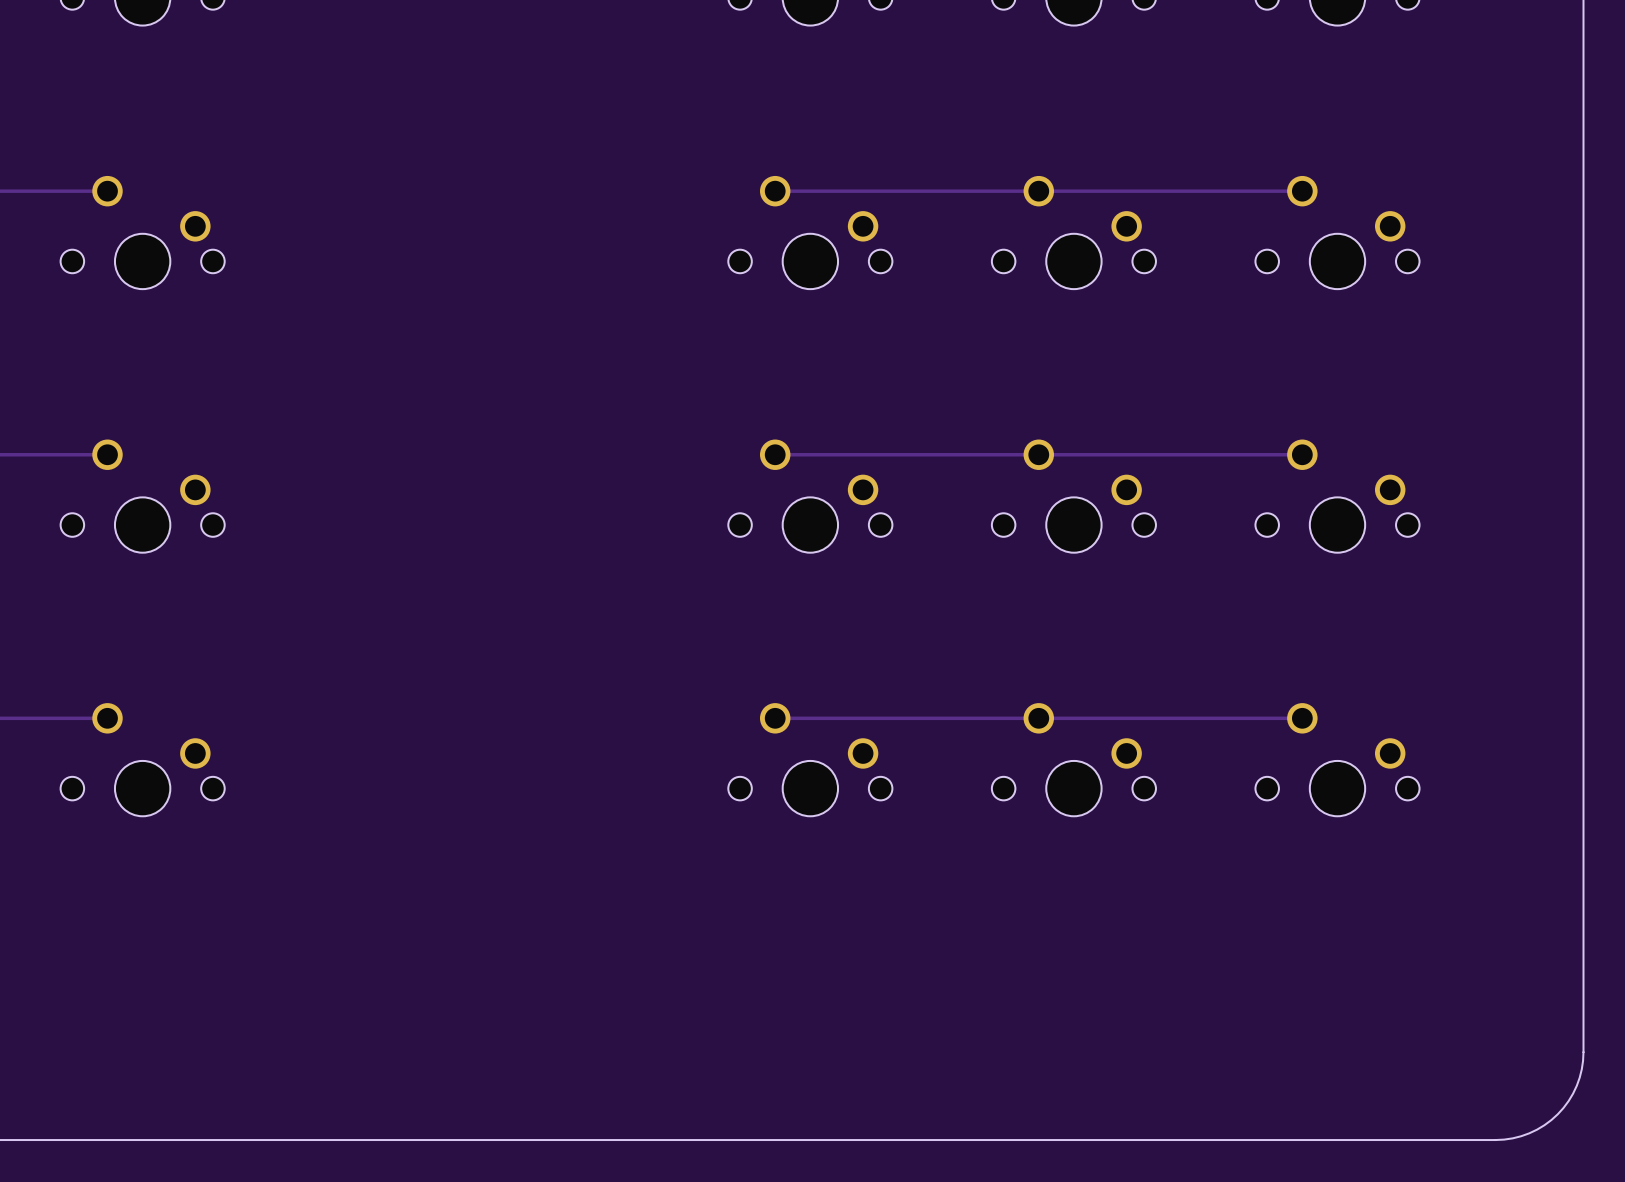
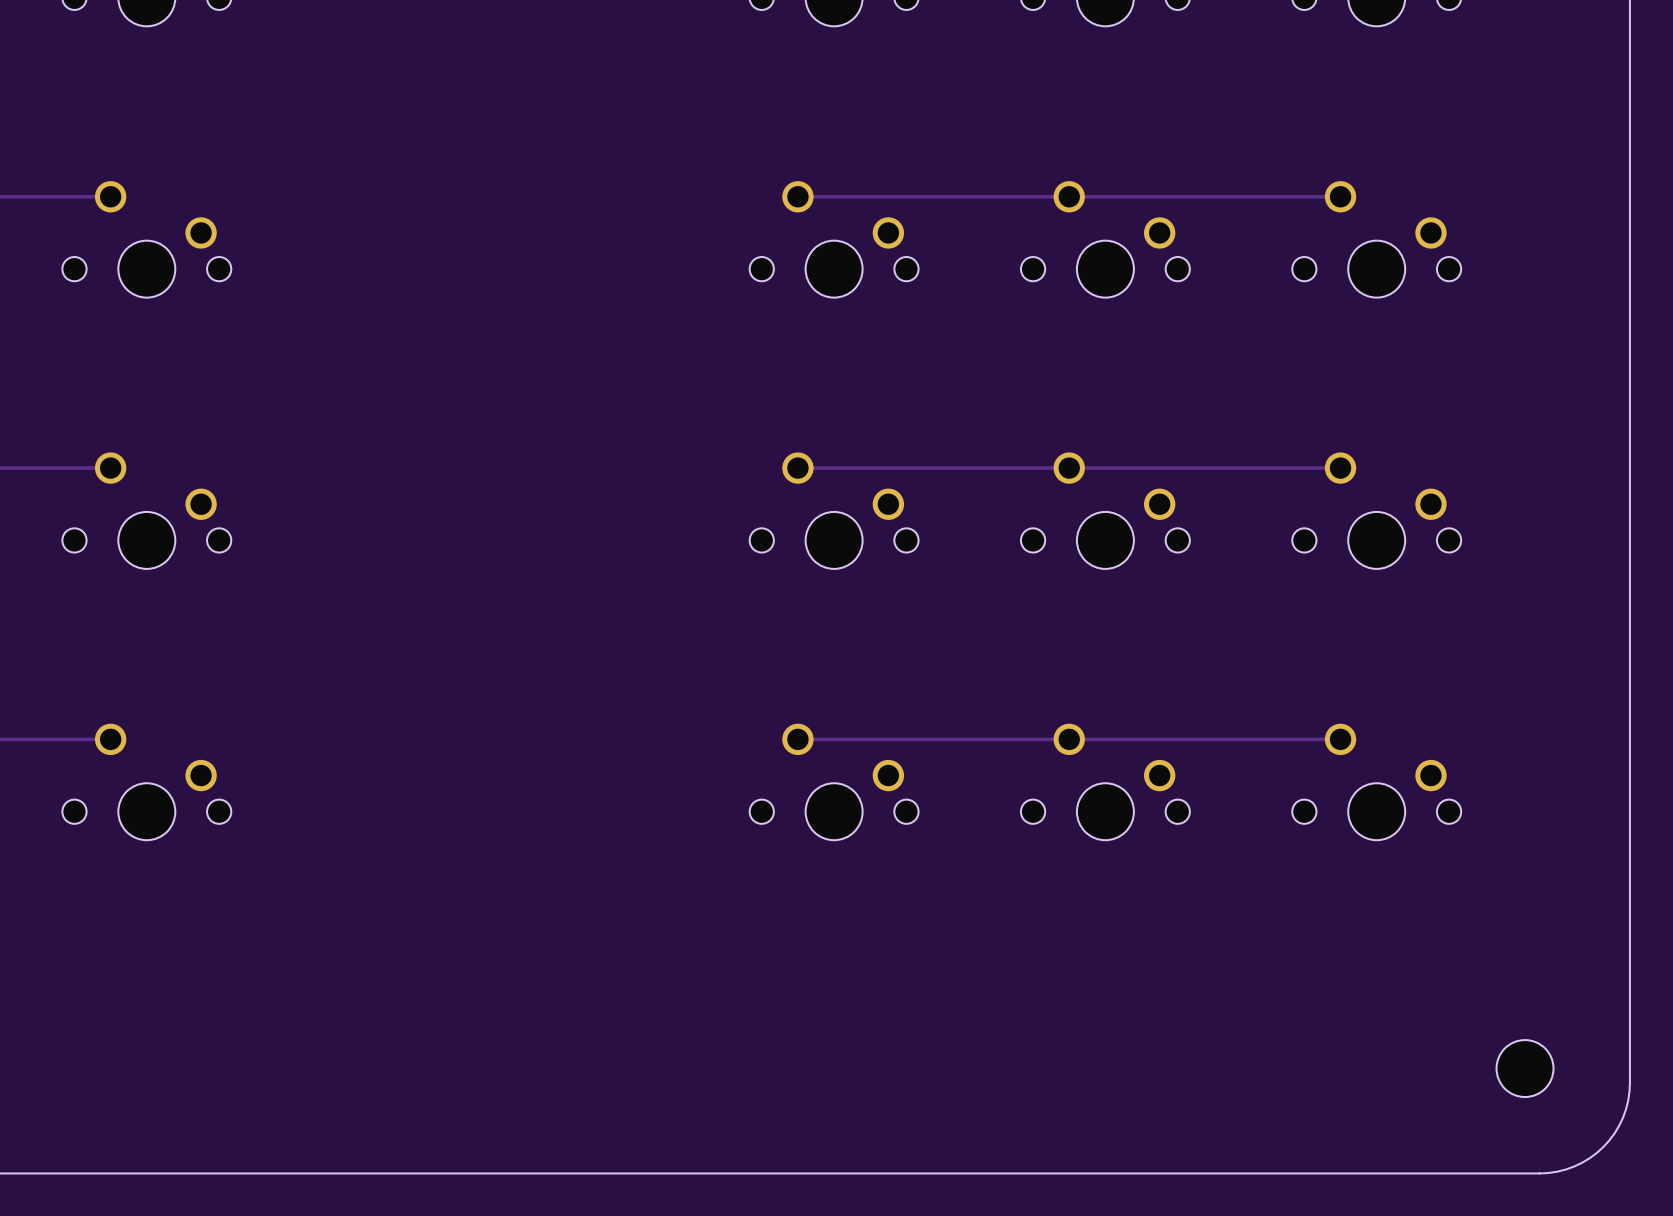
part: none -> (1525, 1068)

